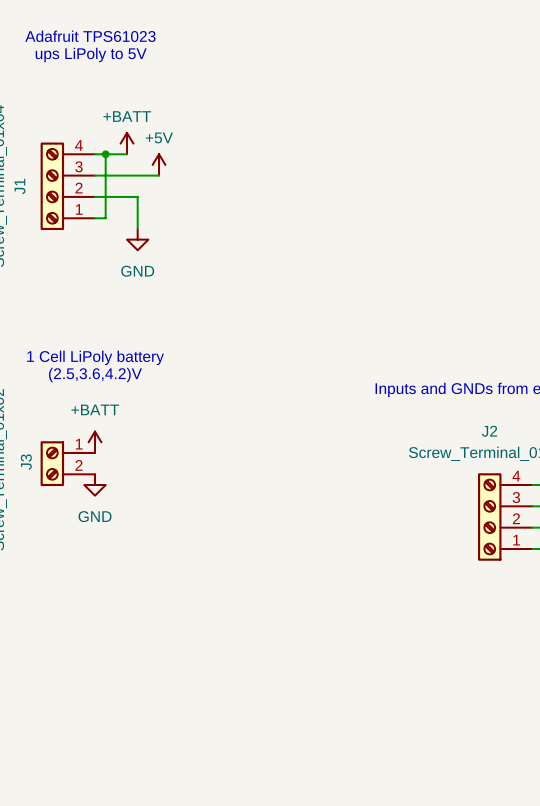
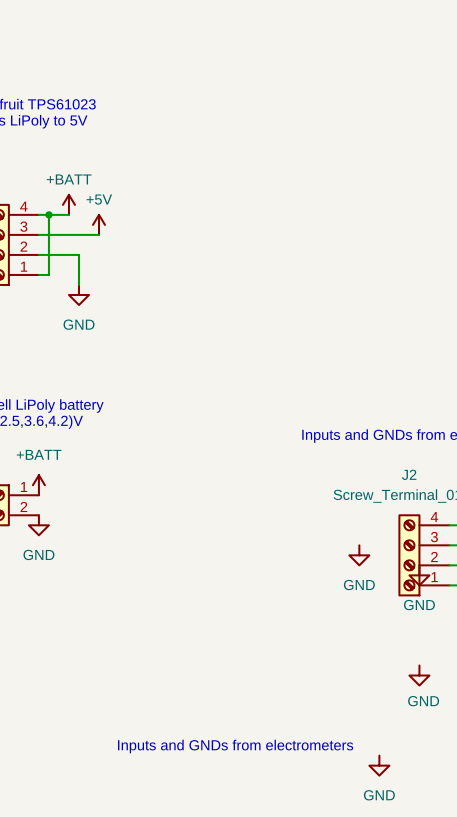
power symbol: none -> GND (359, 555)
power symbol: none -> GND (419, 575)
power symbol: none -> GND (419, 675)
text: none -> Inputs and GNDs from electrometers (235, 746)
power symbol: none -> GND (379, 765)

